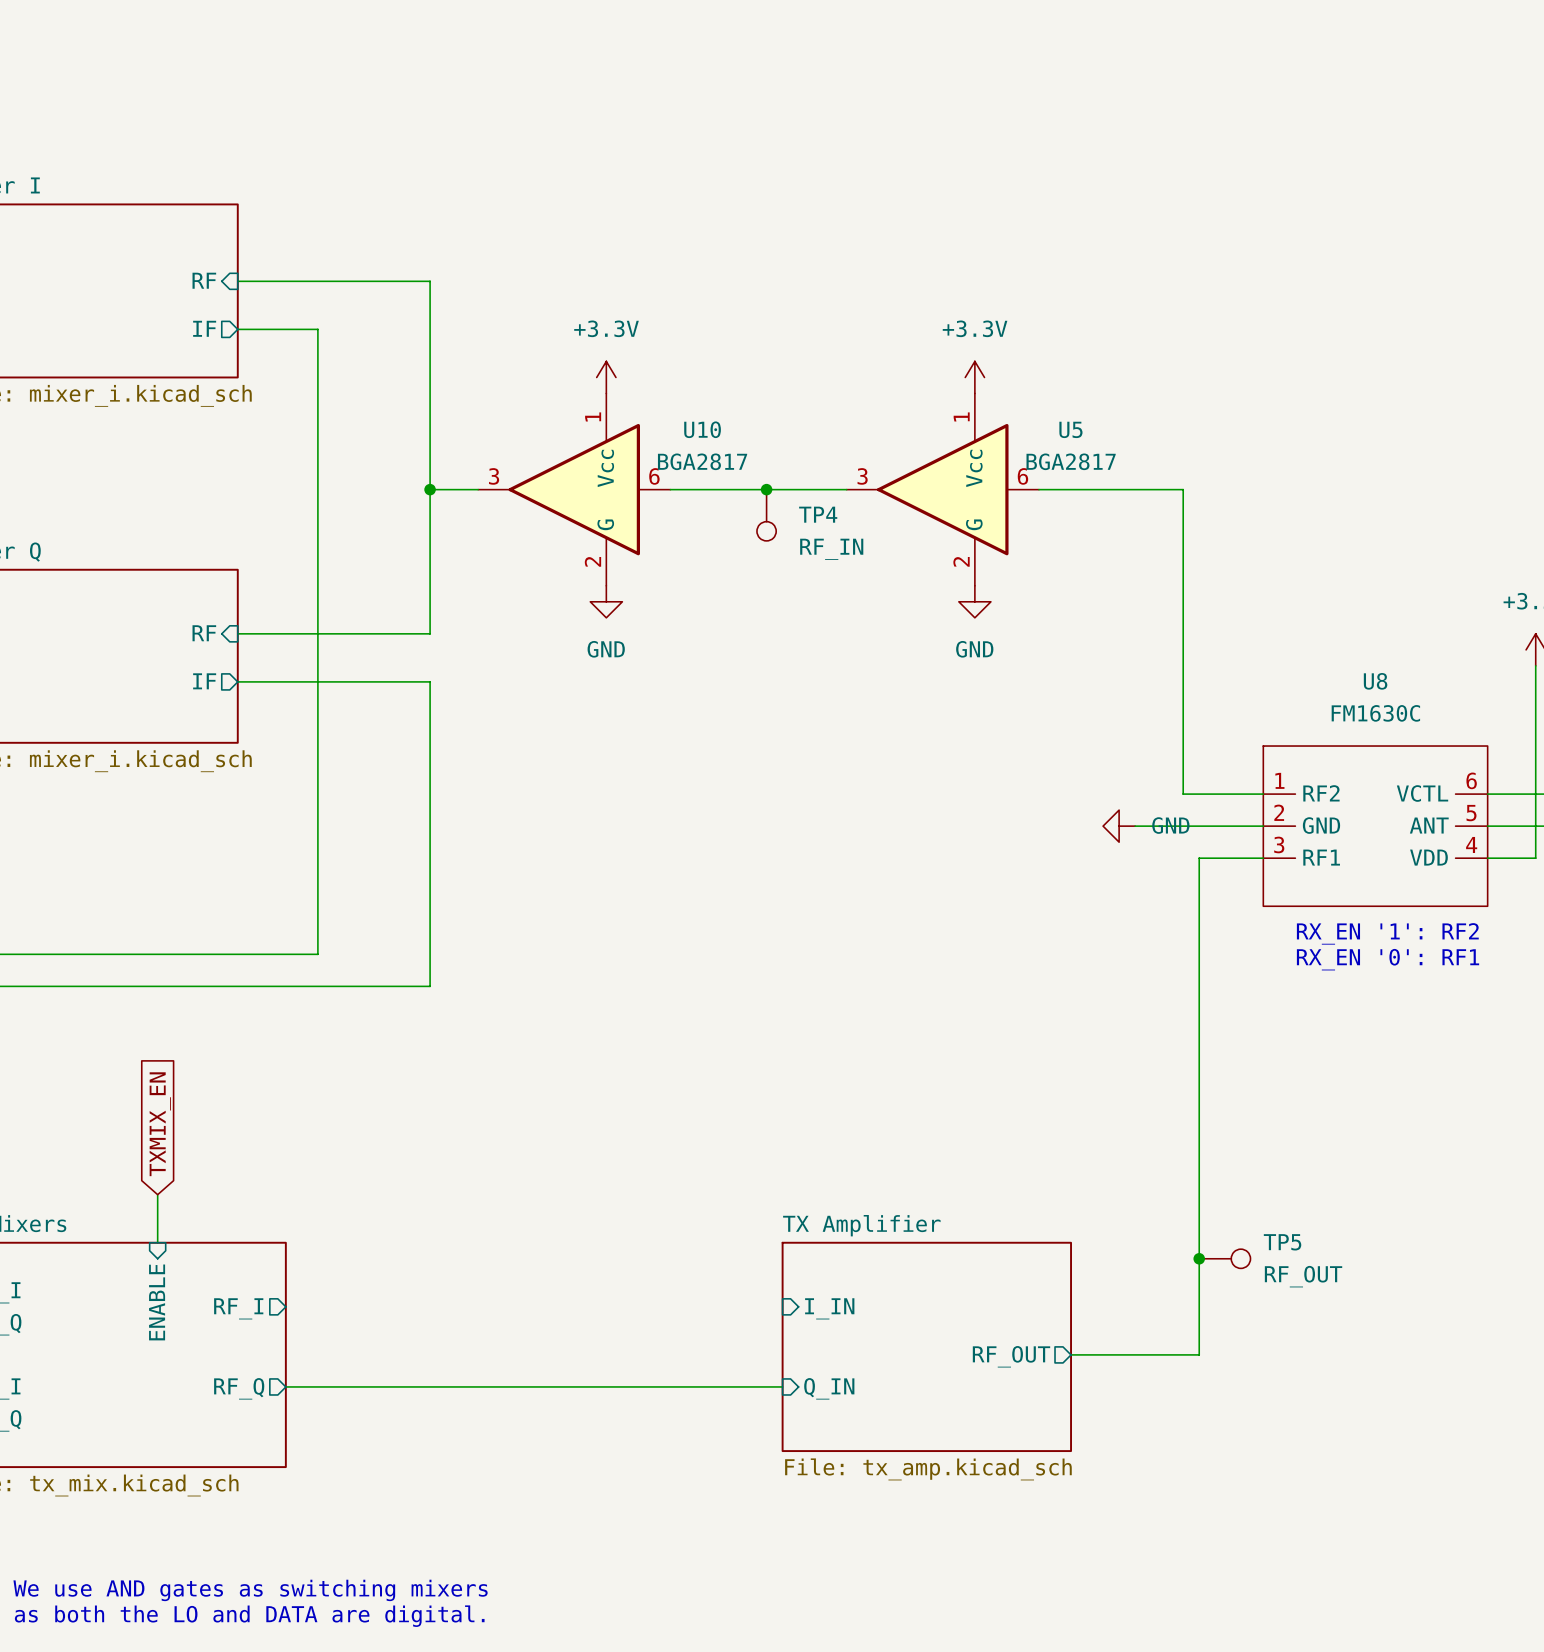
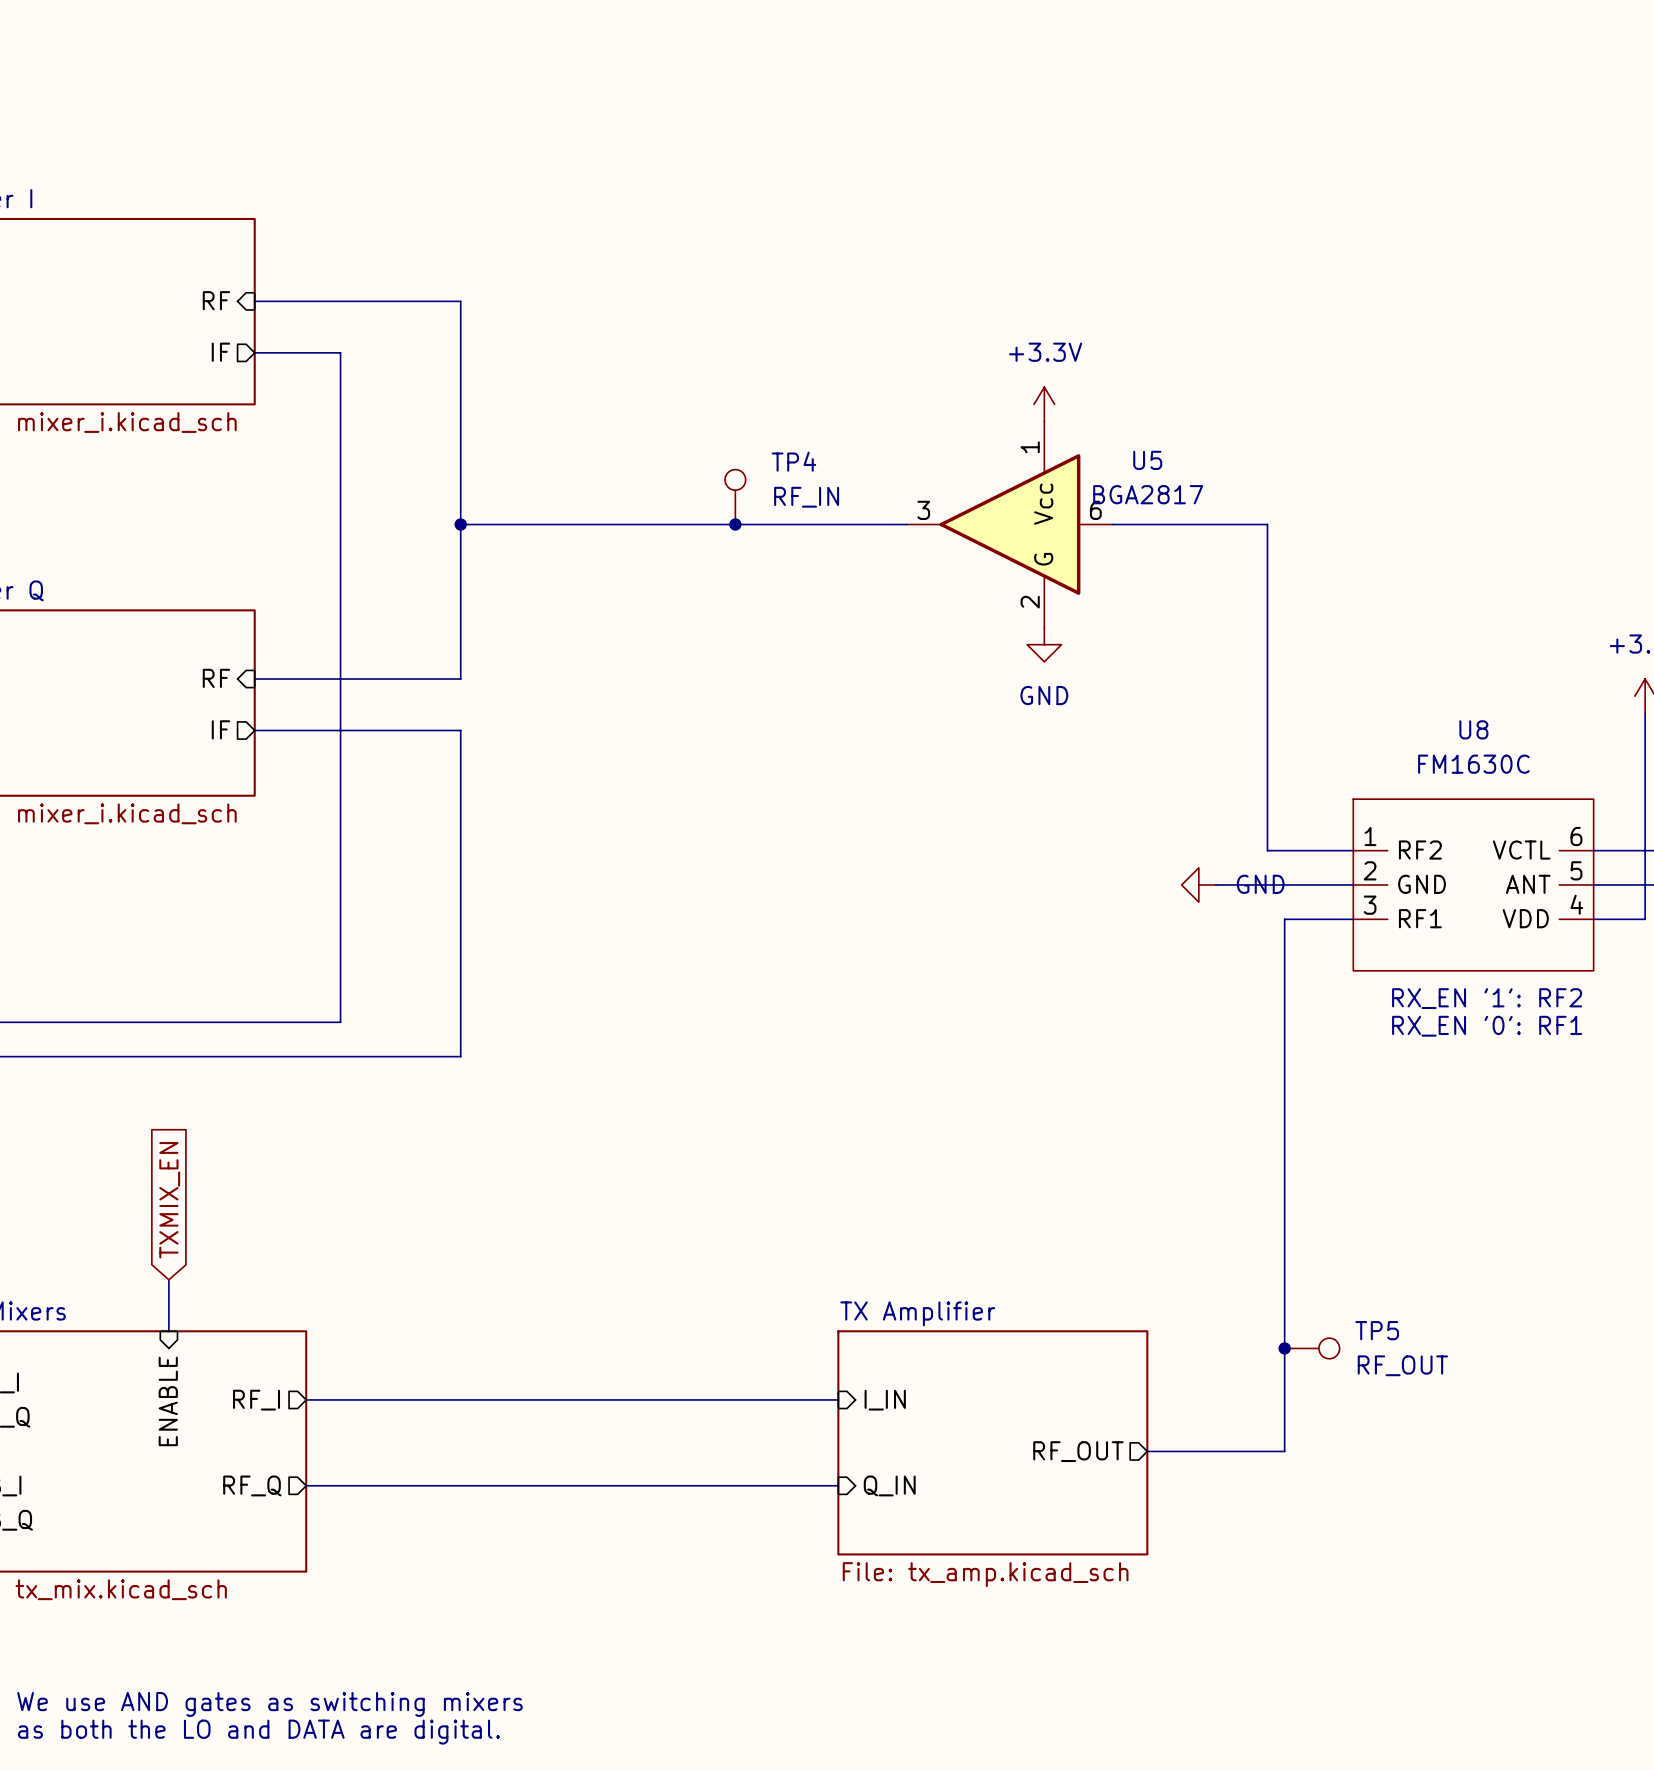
power symbol: +3.3V (606, 377) -> none
U10: BGA2817 (574, 489) -> none
junction: none -> (735, 524)
junction: (766, 489) -> none
TP4 name position: TP4 (818, 514) -> TP4 (793, 461)
TP4 position: (766, 515) -> (735, 497)
TP4 rotation: 0° (766, 531) -> 180° (735, 479)
TP4 value position: RF_IN (831, 549) -> RF_IN (806, 497)
power symbol: GND (606, 601) -> none
wire: none -> (306, 1399) (838, 1399)

